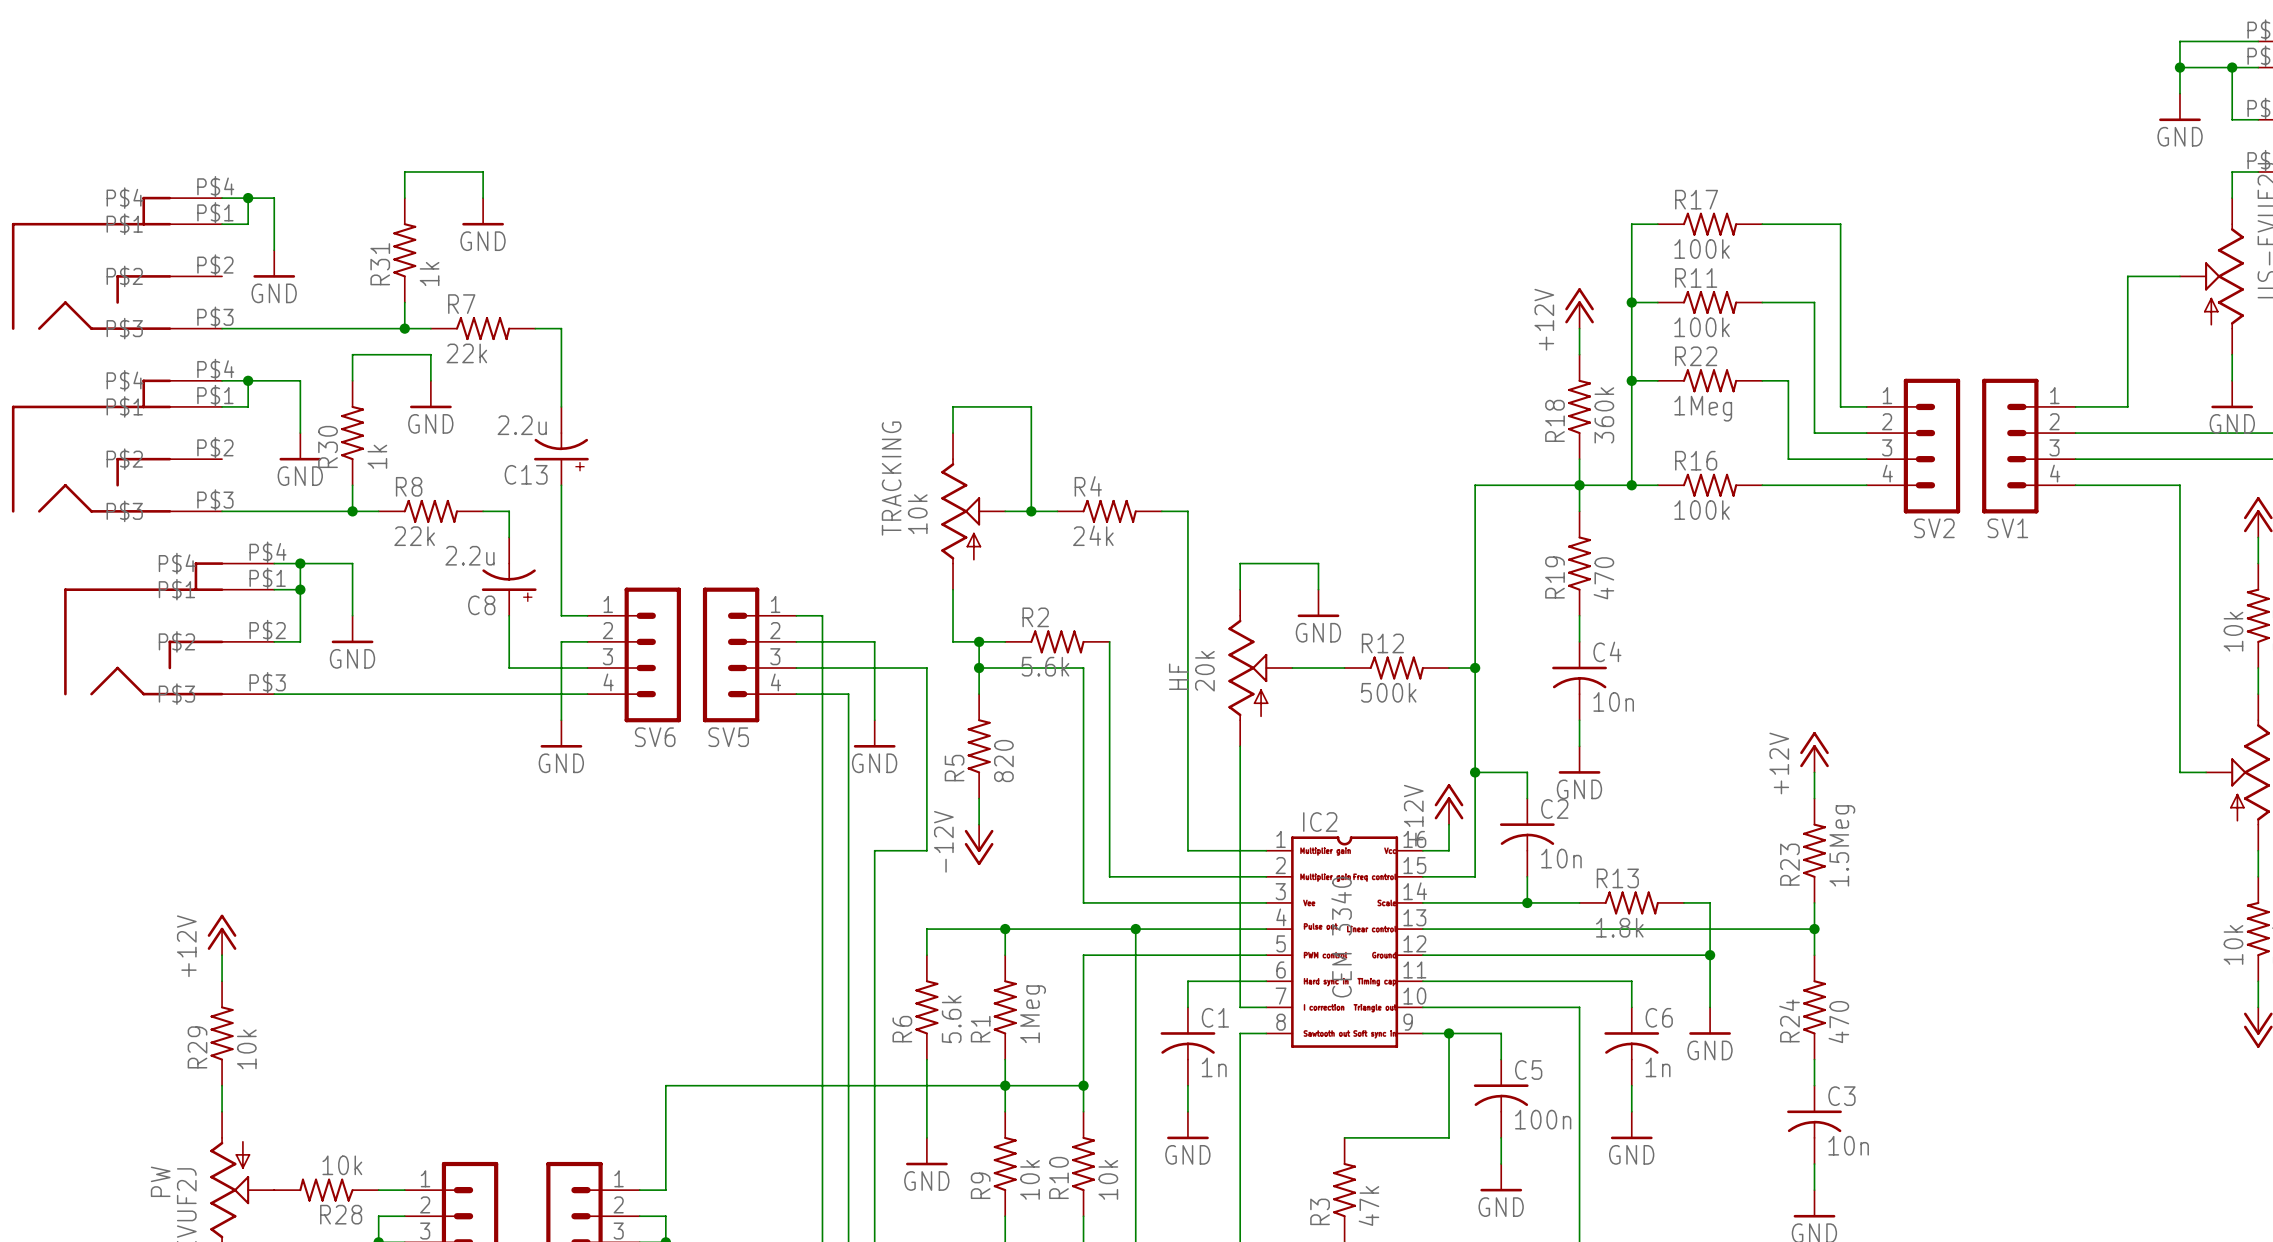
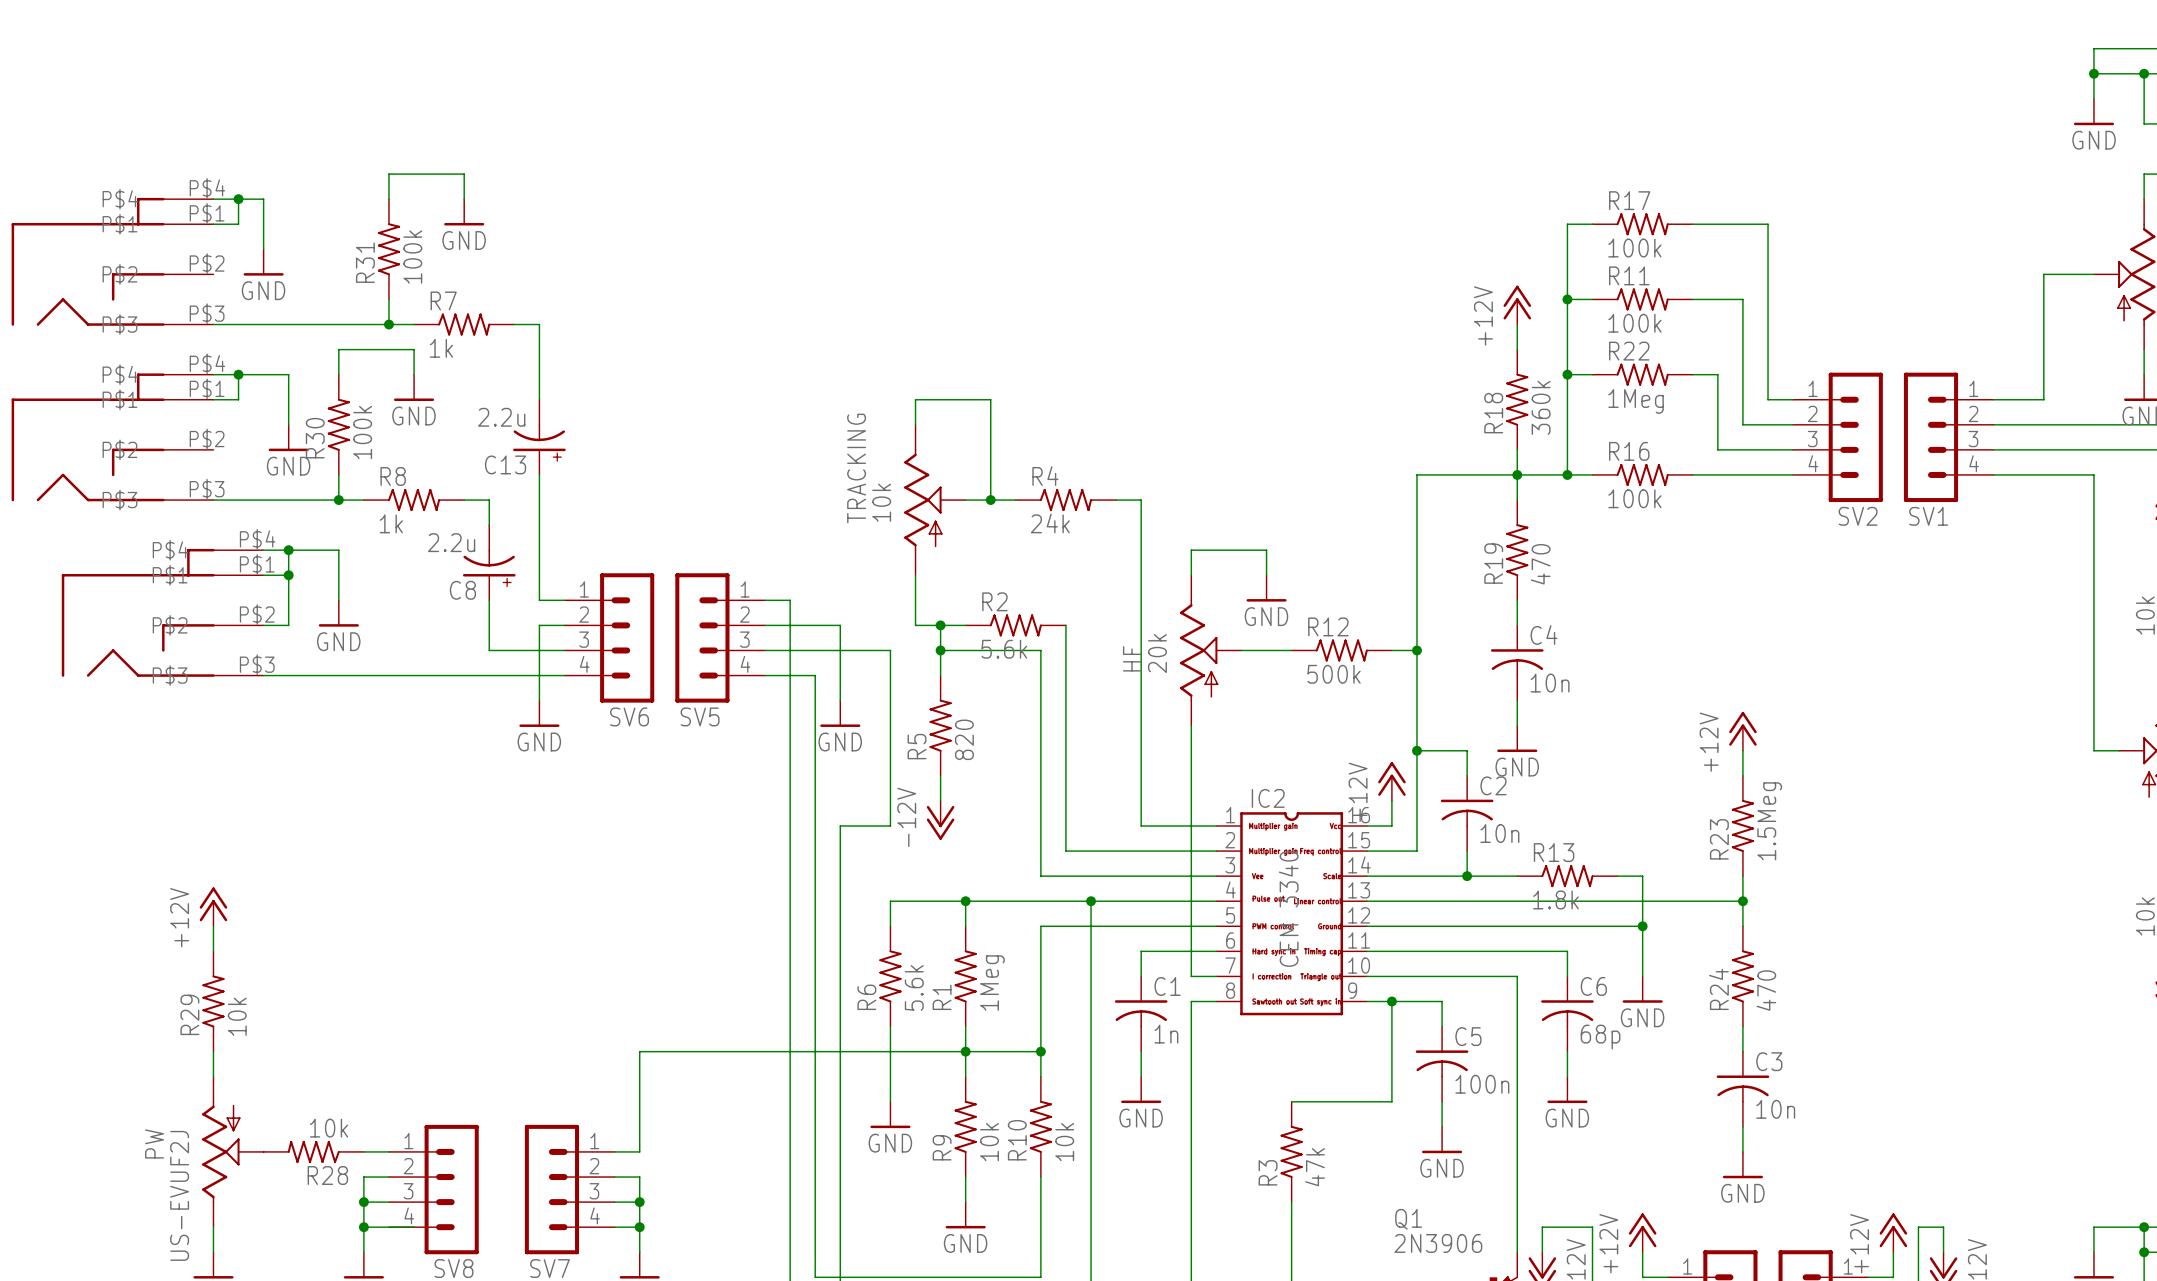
R31 value: 1k (429, 274) -> 100k (412, 257)
R7 value: 22k (466, 353) -> 1k (441, 348)
R30 value: 1k (377, 456) -> 100k (362, 432)
R8 value: 22k (414, 536) -> 1k (391, 523)
C6 value: 1n (1658, 1067) -> 68p (1600, 1037)

